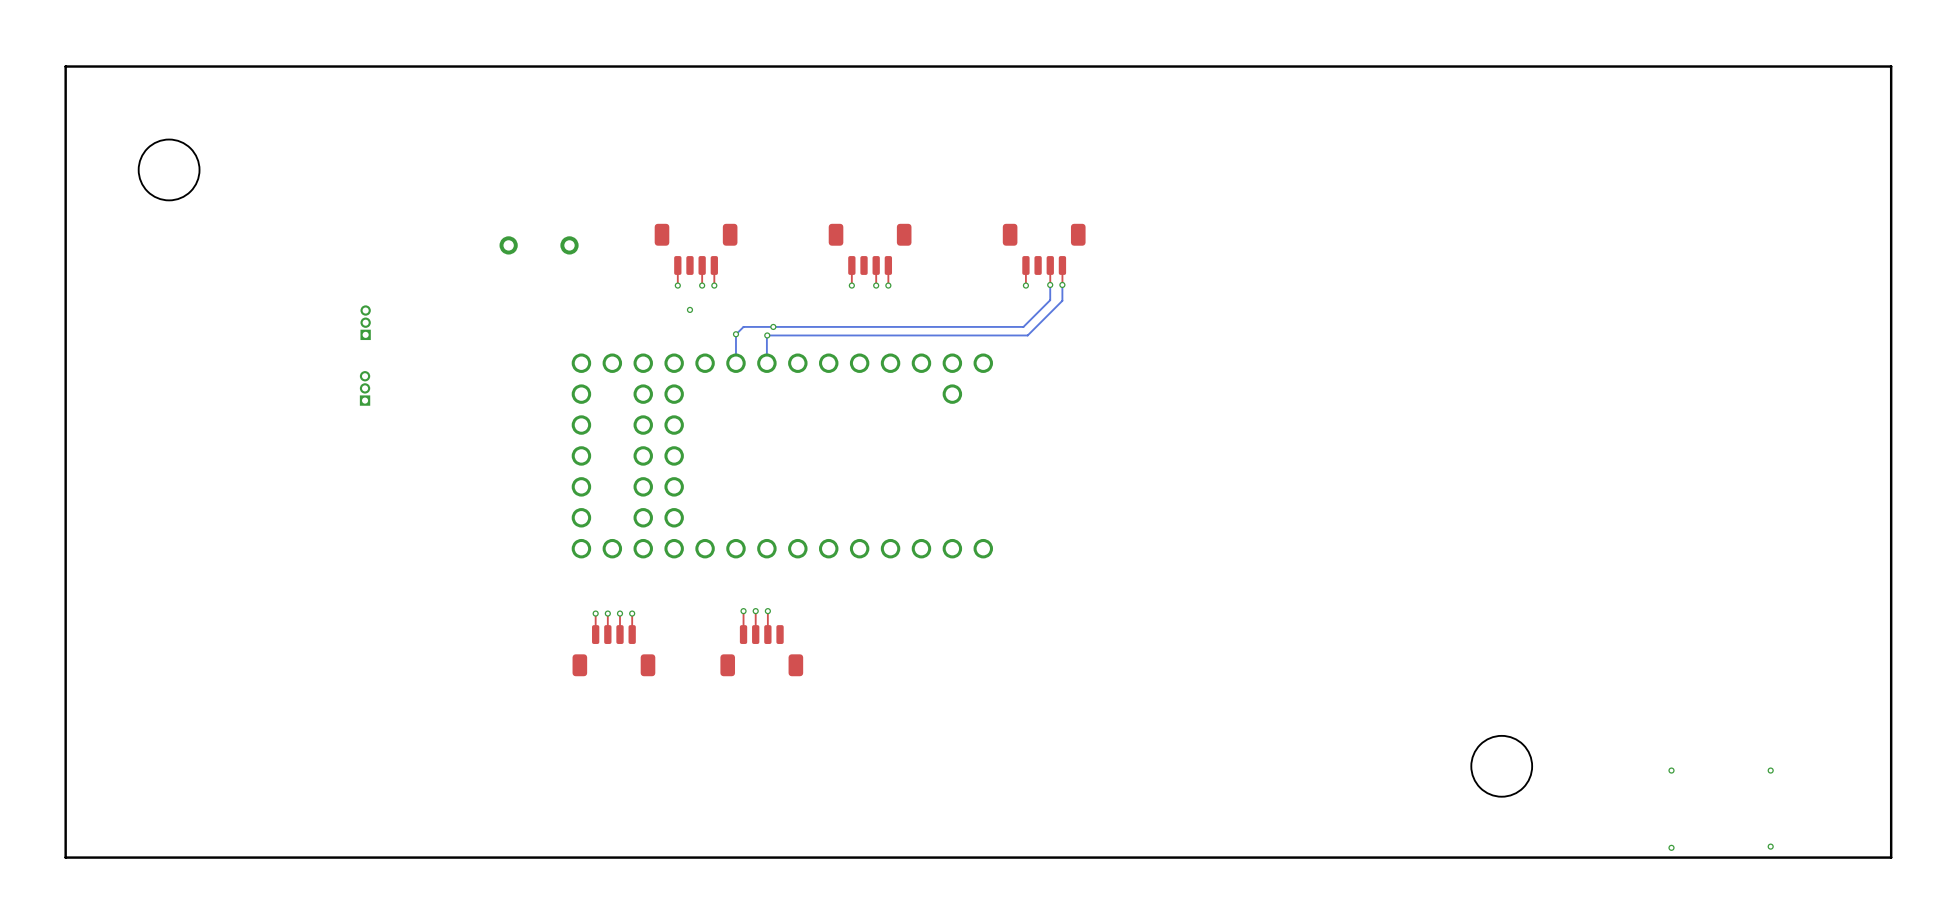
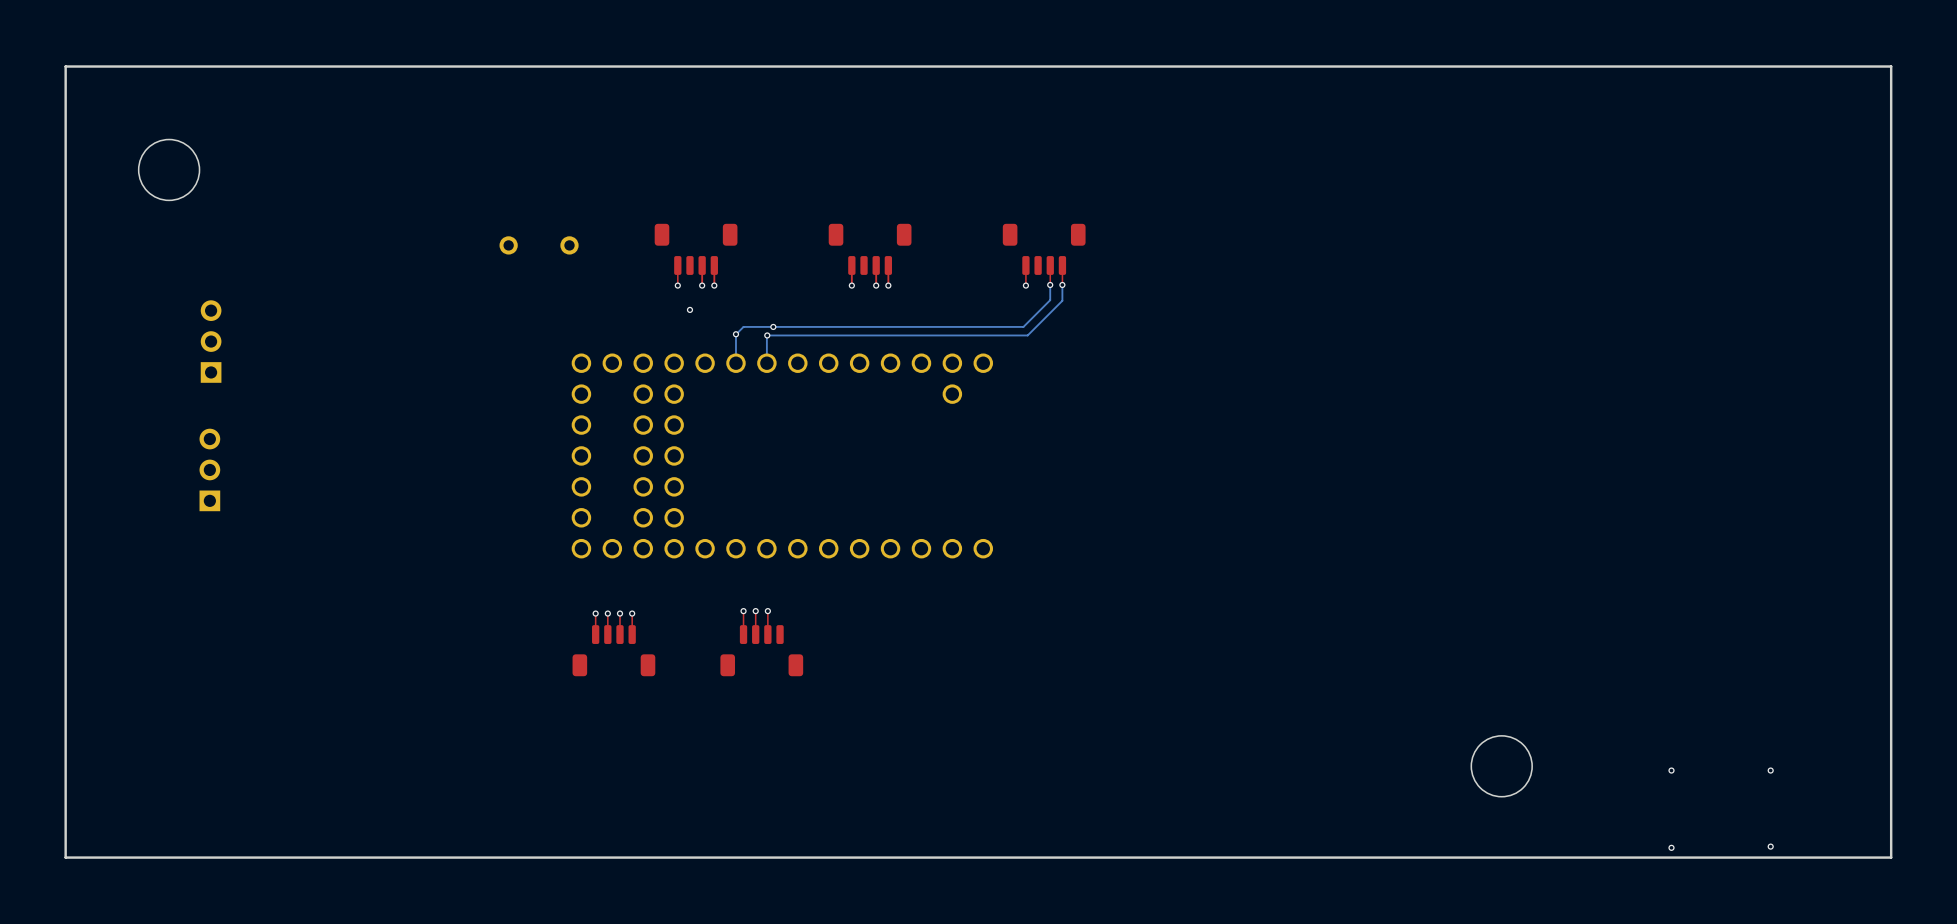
part: (365, 322) -> none
part: none -> (211, 341)
part: (365, 388) -> none
part: none -> (209, 469)

